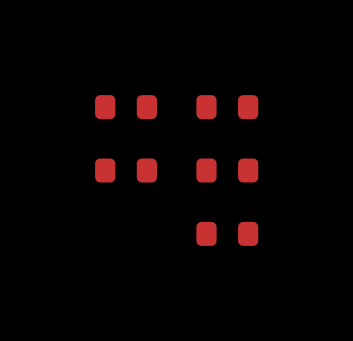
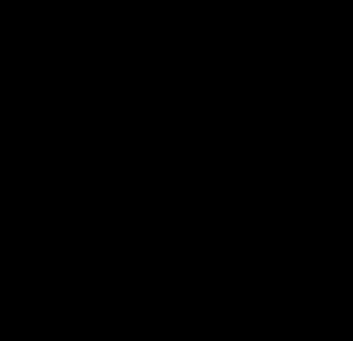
part: (126, 107) -> none
part: (227, 107) -> none
part: (126, 170) -> none
part: (227, 170) -> none
part: (227, 233) -> none

